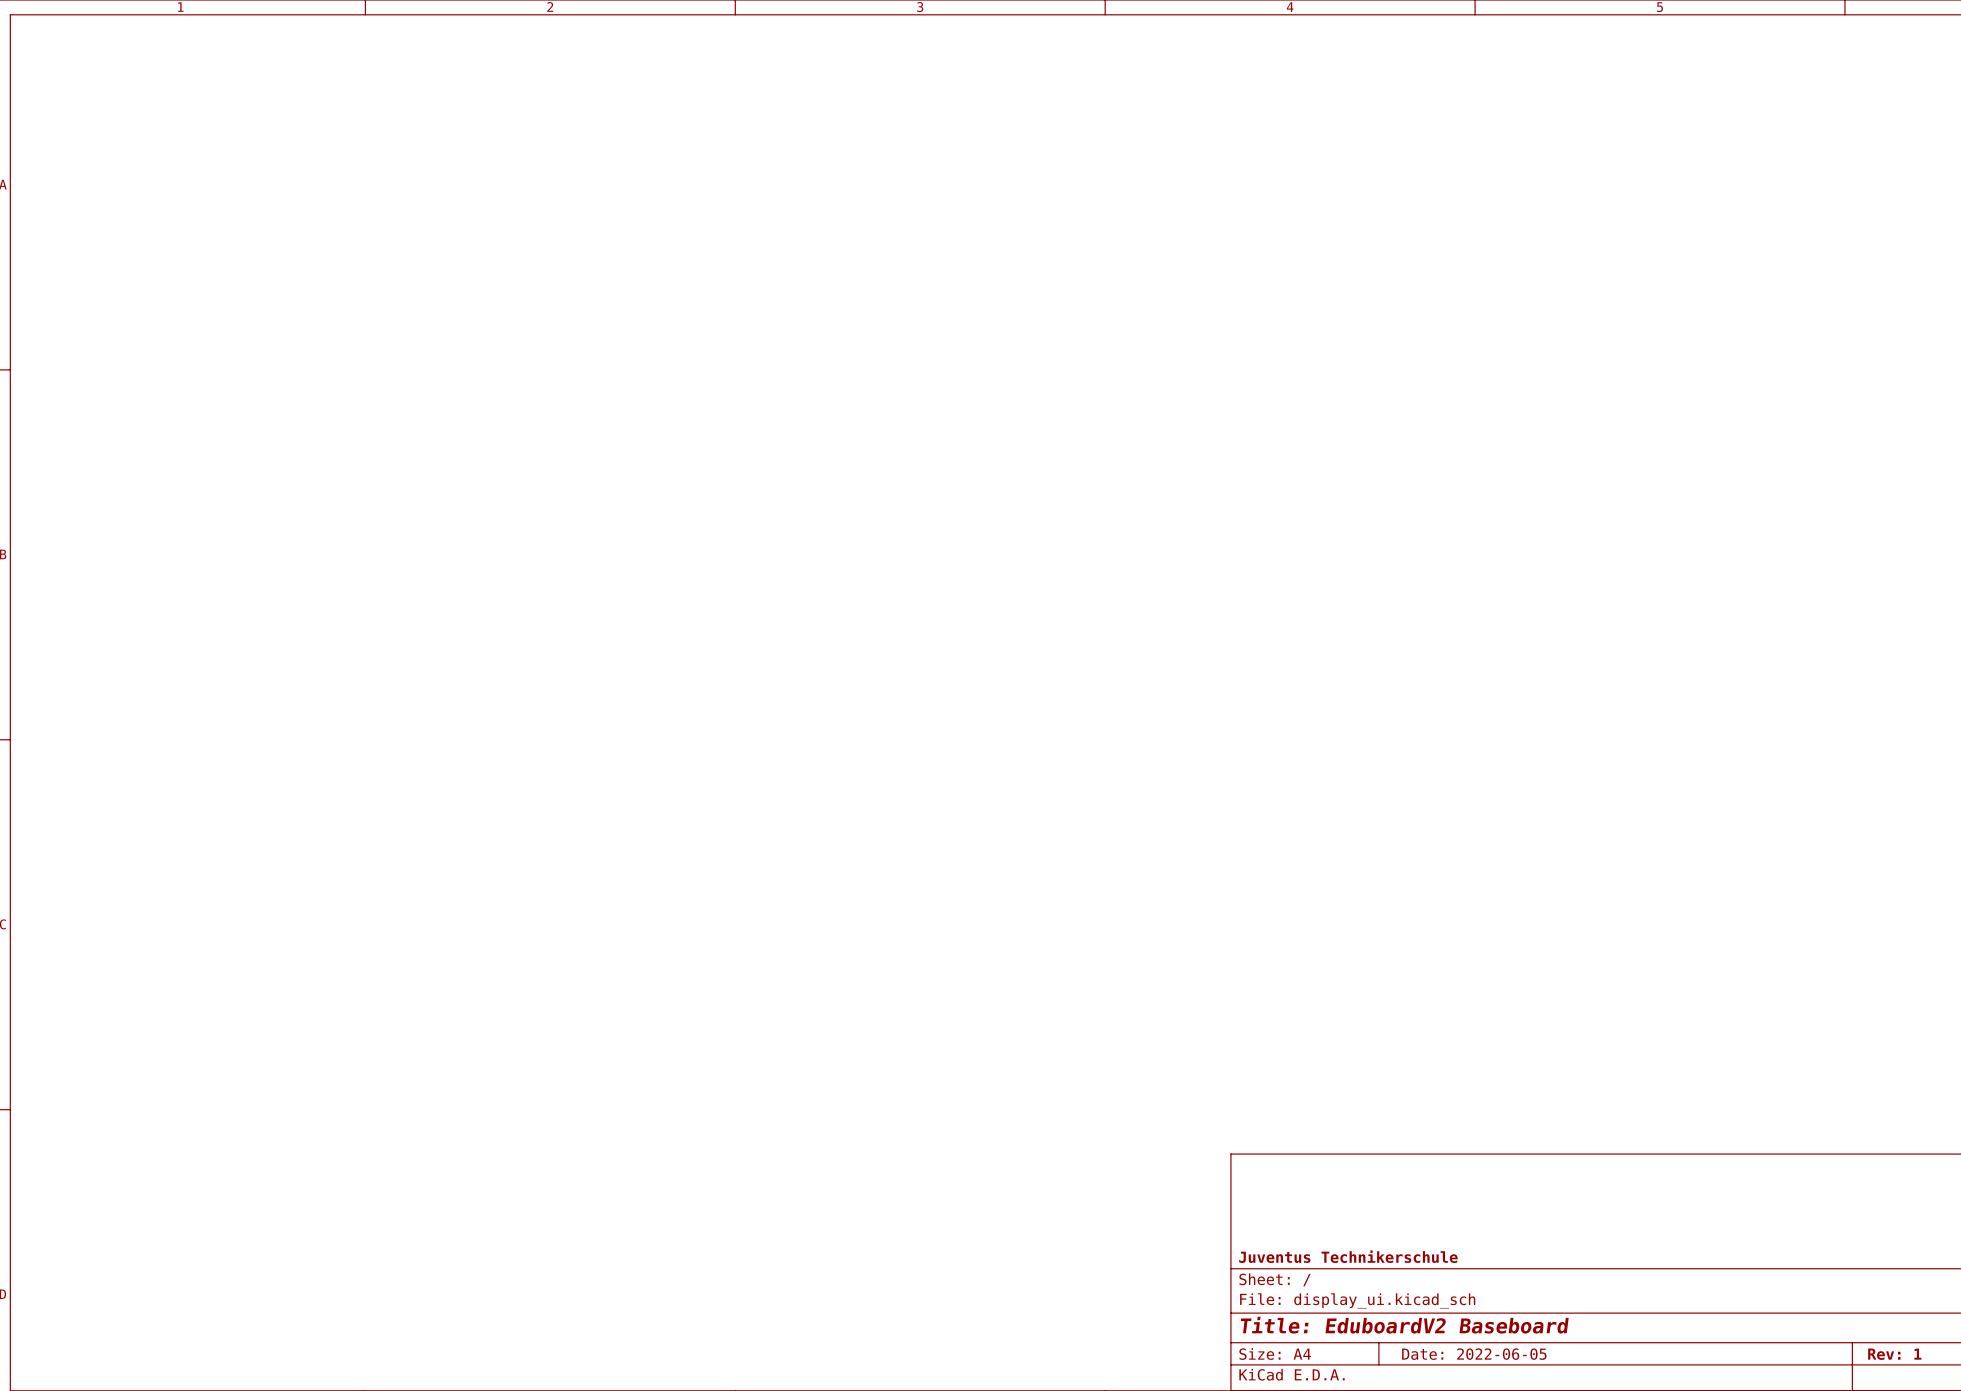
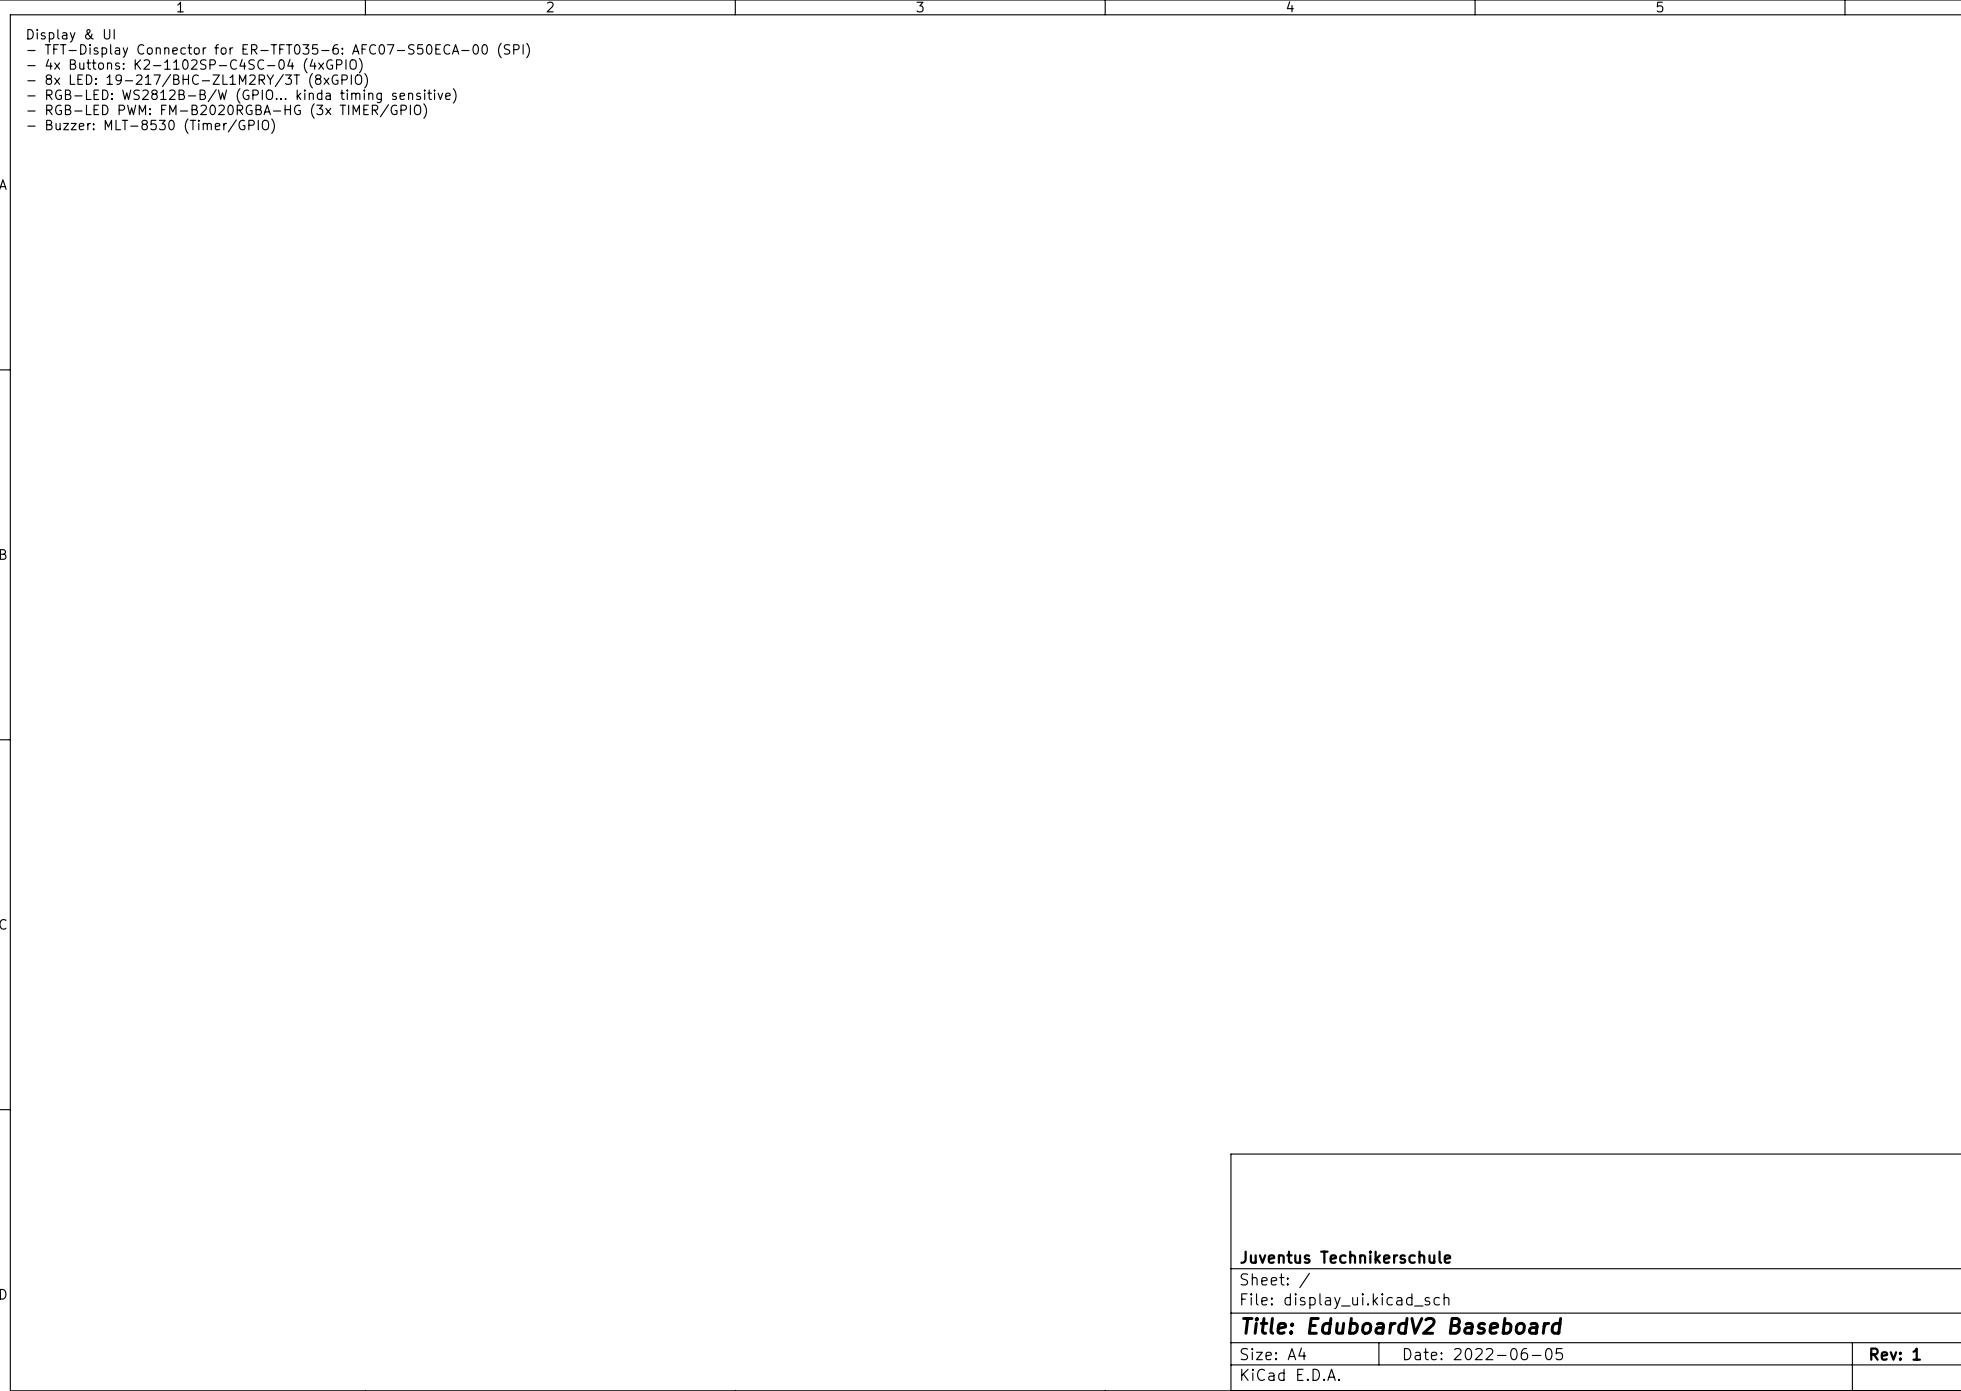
text: none -> Display & UI (71, 35)
text: none -> - TFT-Display Connector for ER-TFT035-6: AFC07-S50ECA-00 (SPI) (278, 50)
text: none -> - 4x Buttons: K2-1102SP-C4SC-04 (4xGPIO) (194, 65)
text: none -> - 8x LED: 19-217/BHC-ZL1M2RY/3T (8xGPIO) (197, 80)
text: none -> - RGB-LED: WS2812B-B/W (GPIO... kinda timing sensitive) (241, 95)
text: none -> - RGB-LED PWM: FM-B2020RGBA-HG (3x TIMER/GPIO) (227, 111)
text: none -> - Buzzer: MLT-8530 (Timer/GPIO) (151, 126)

